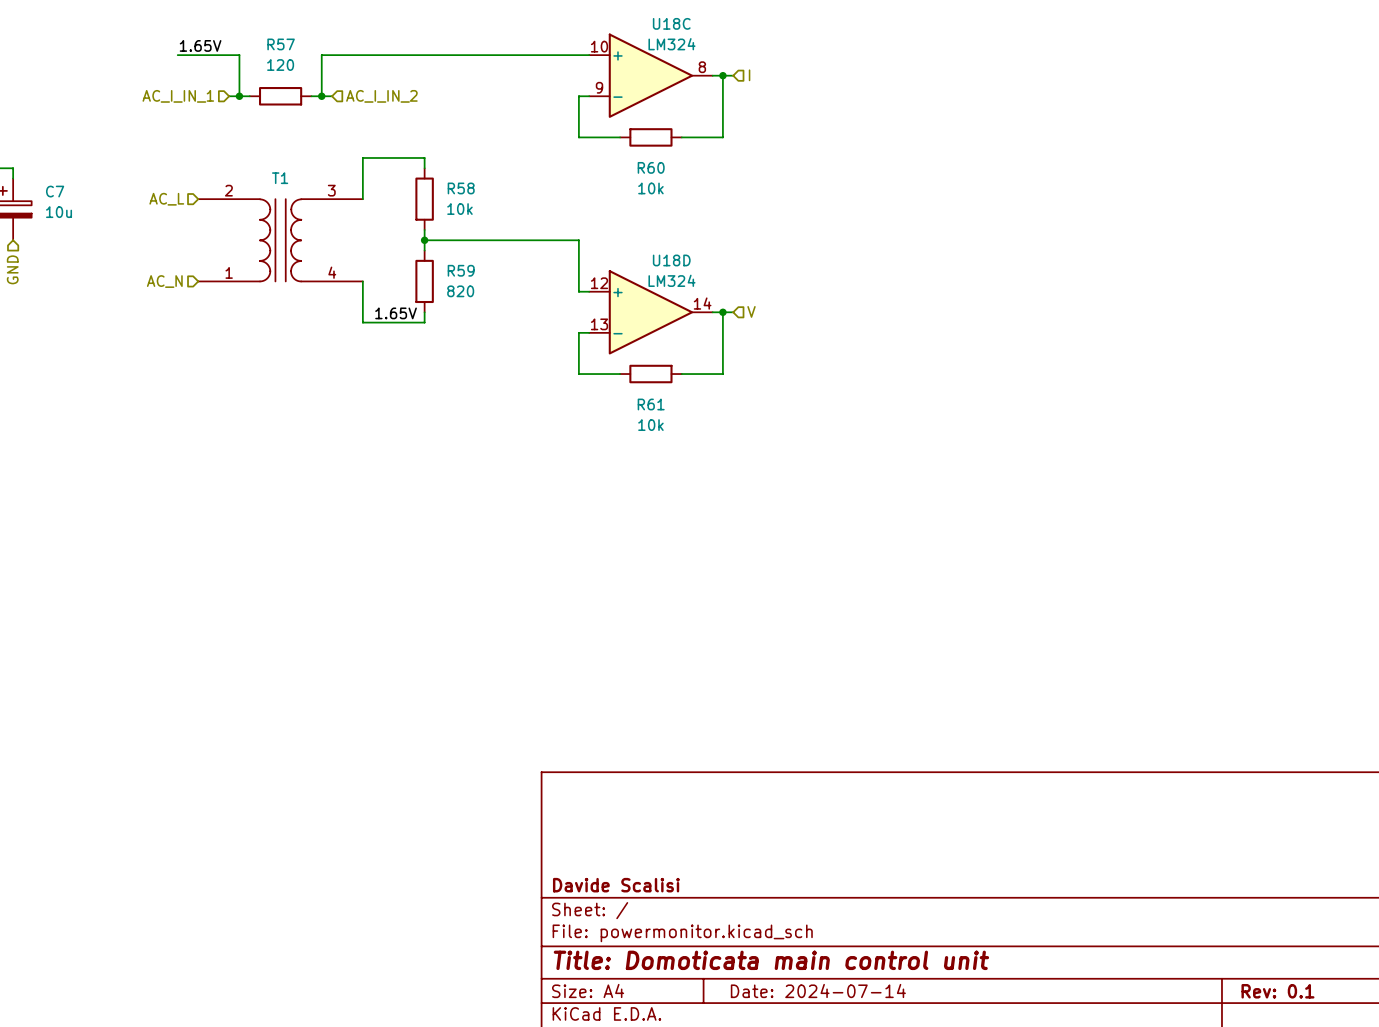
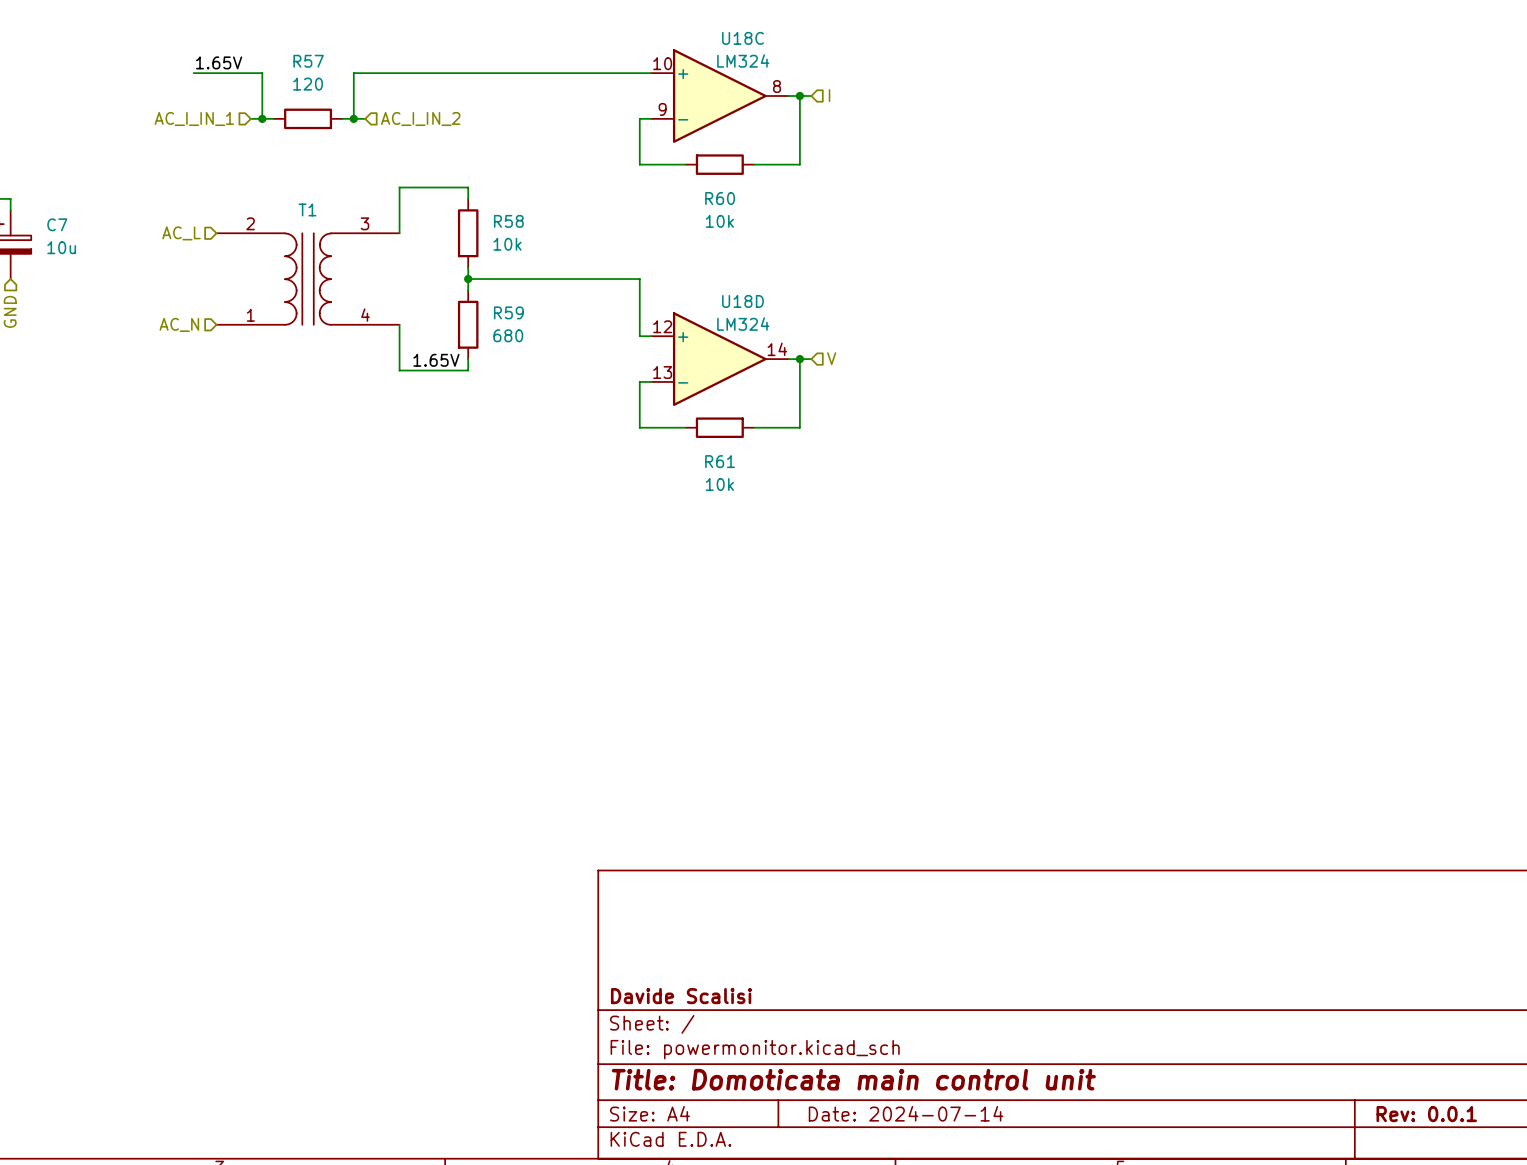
R59 value: 820 (460, 291) -> 680 (508, 335)
title block: Rev: 0.1 (1277, 991) -> Rev: 0.0.1 (1426, 1114)

